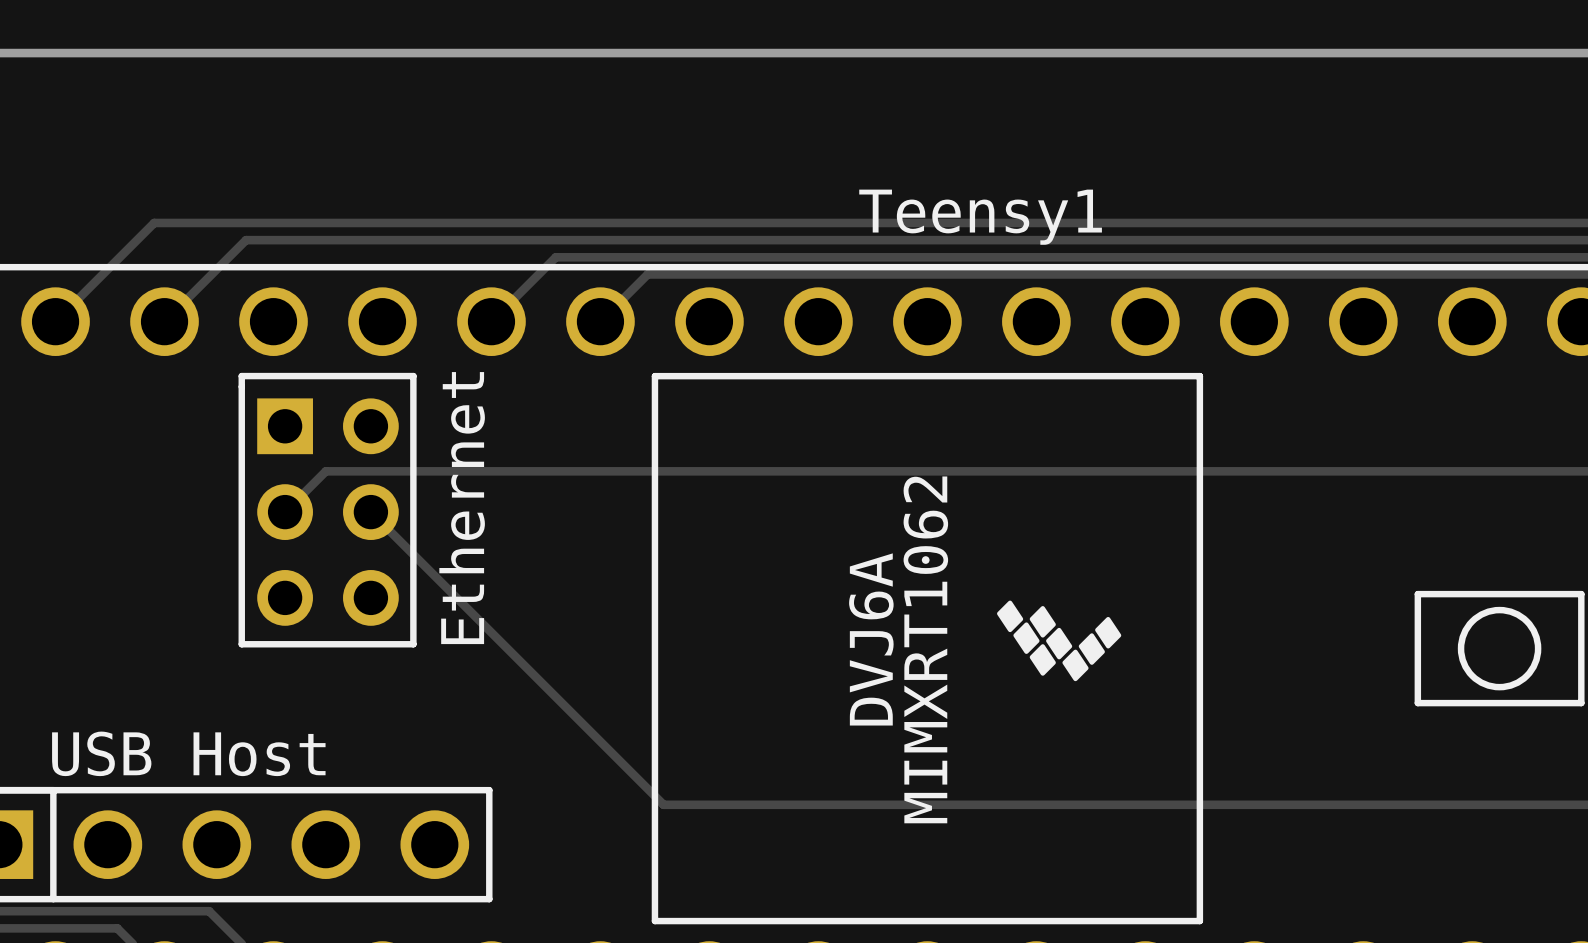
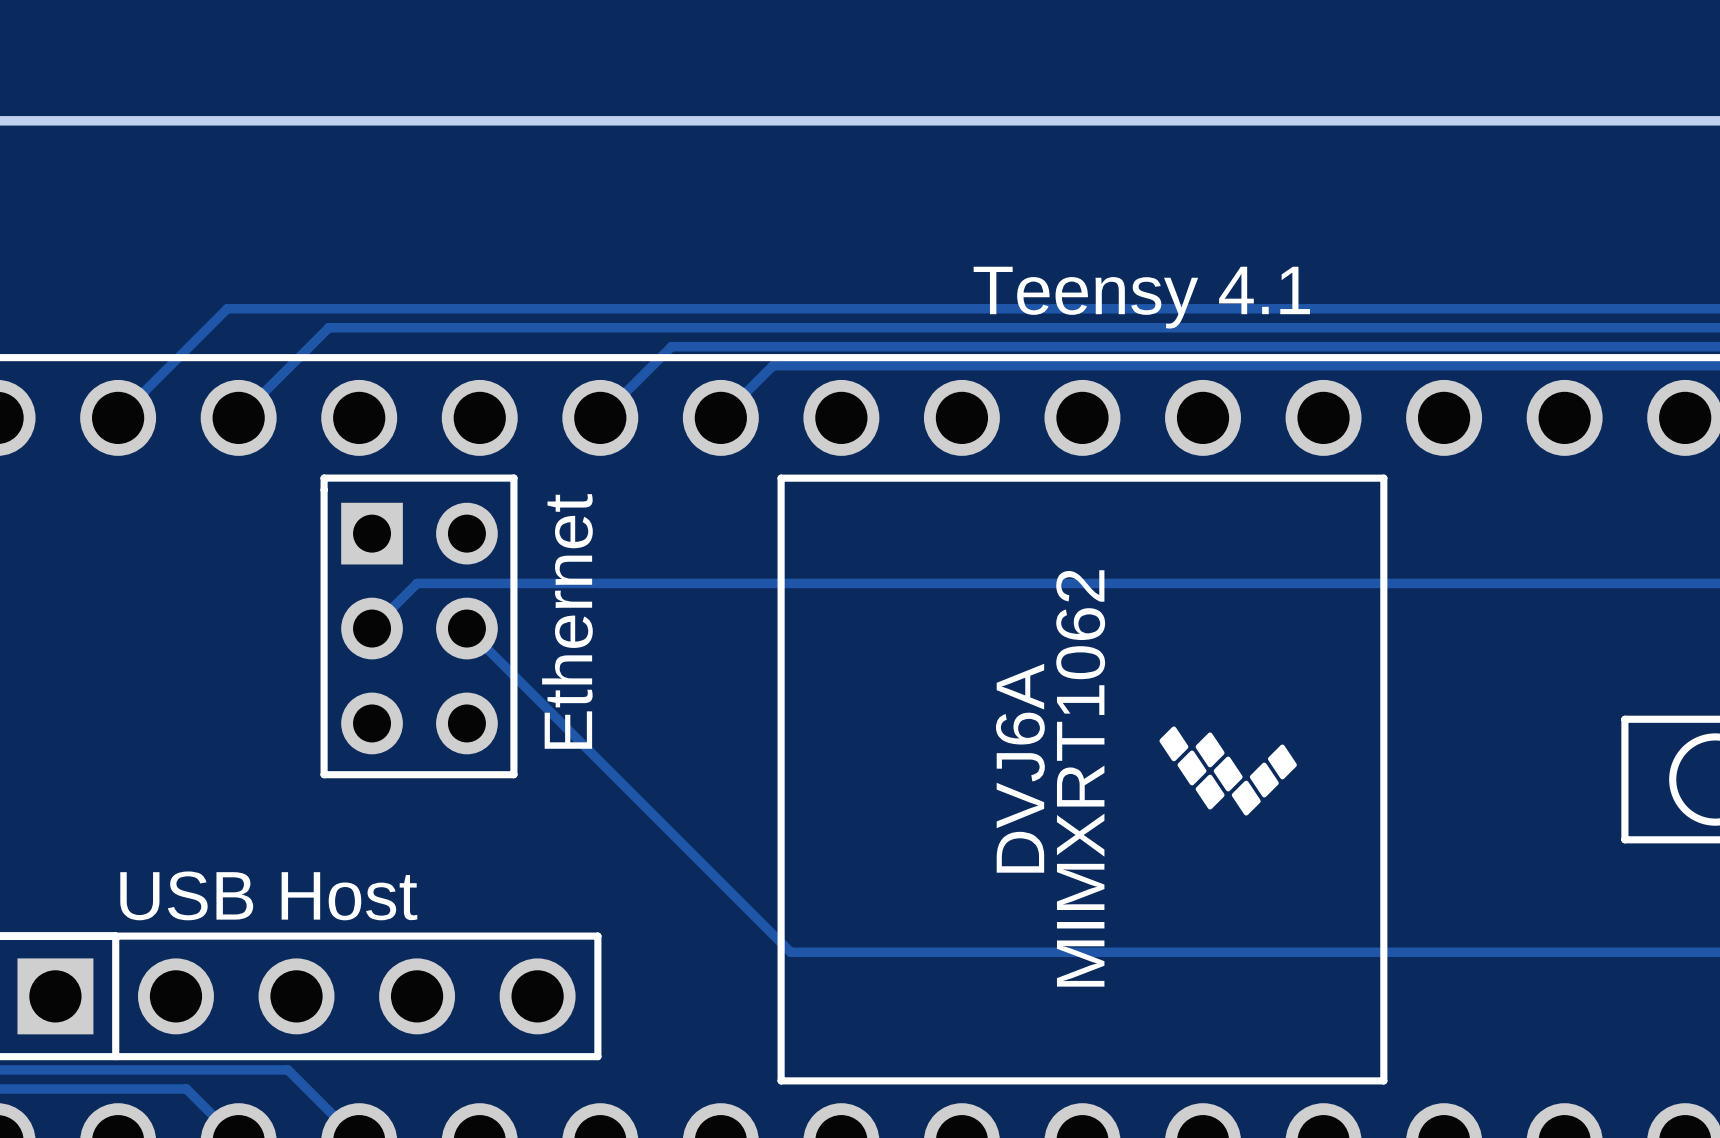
Teensy1 name: Teensy1 (980, 217) -> Teensy 4.1 (1141, 297)

